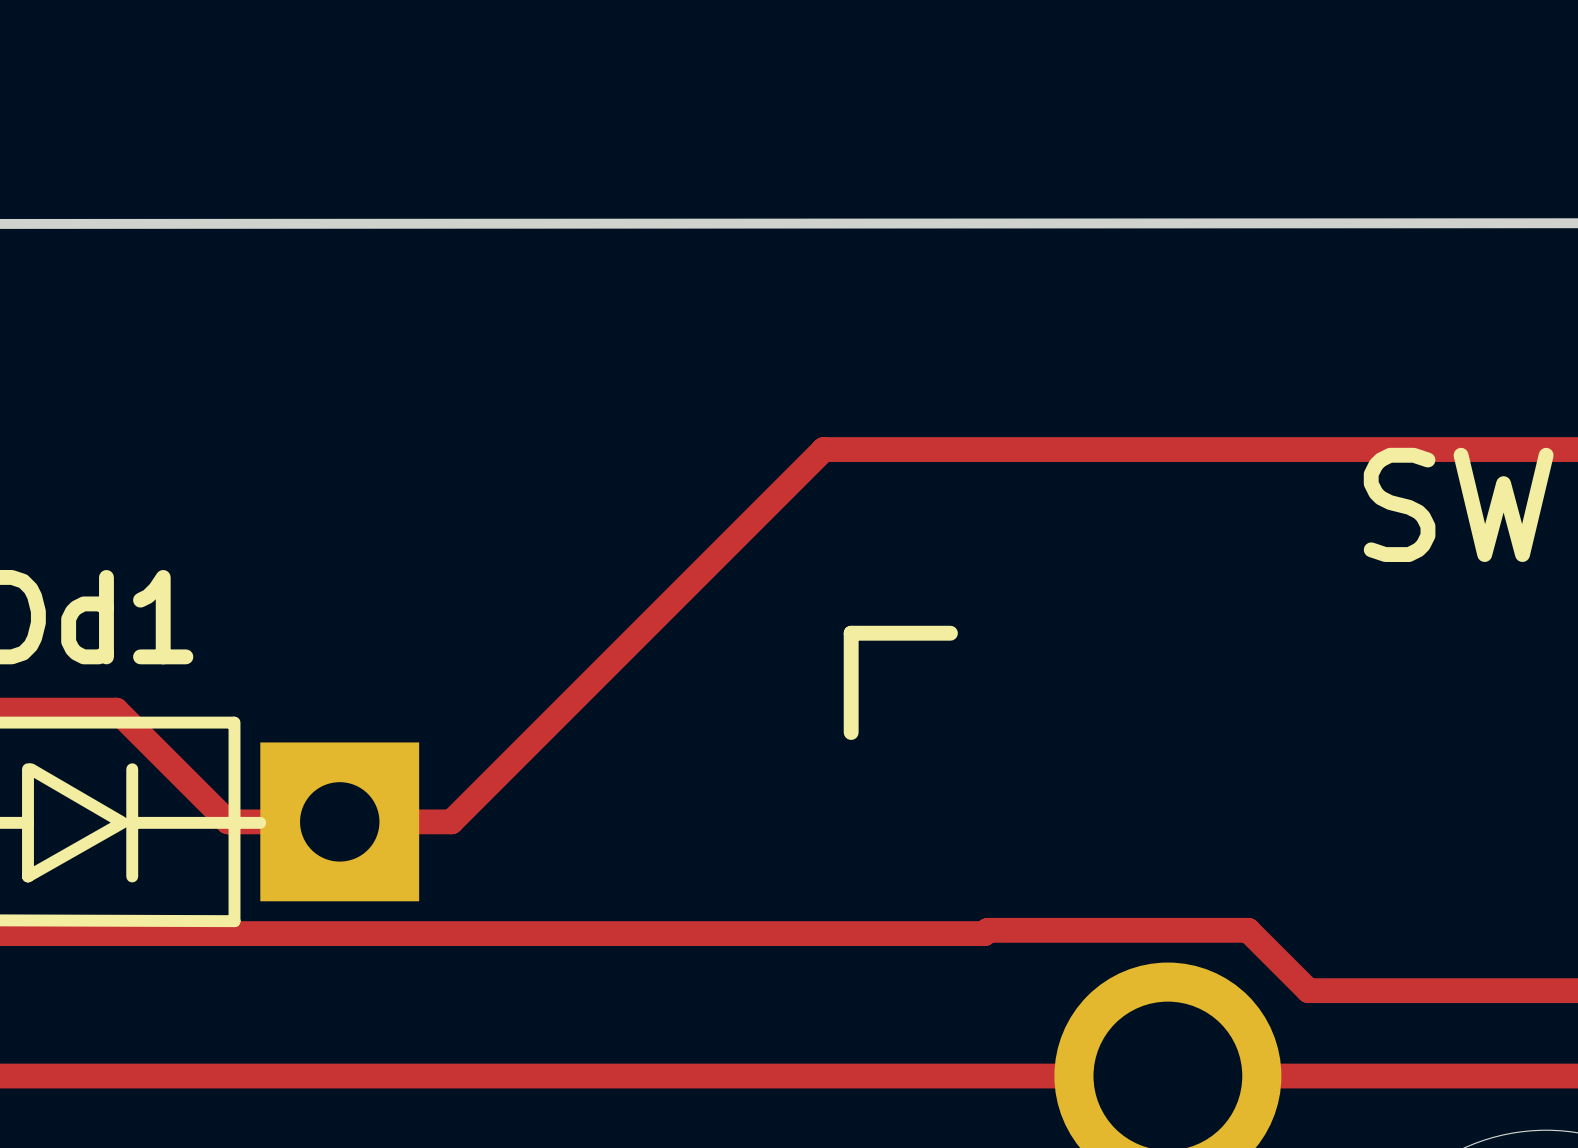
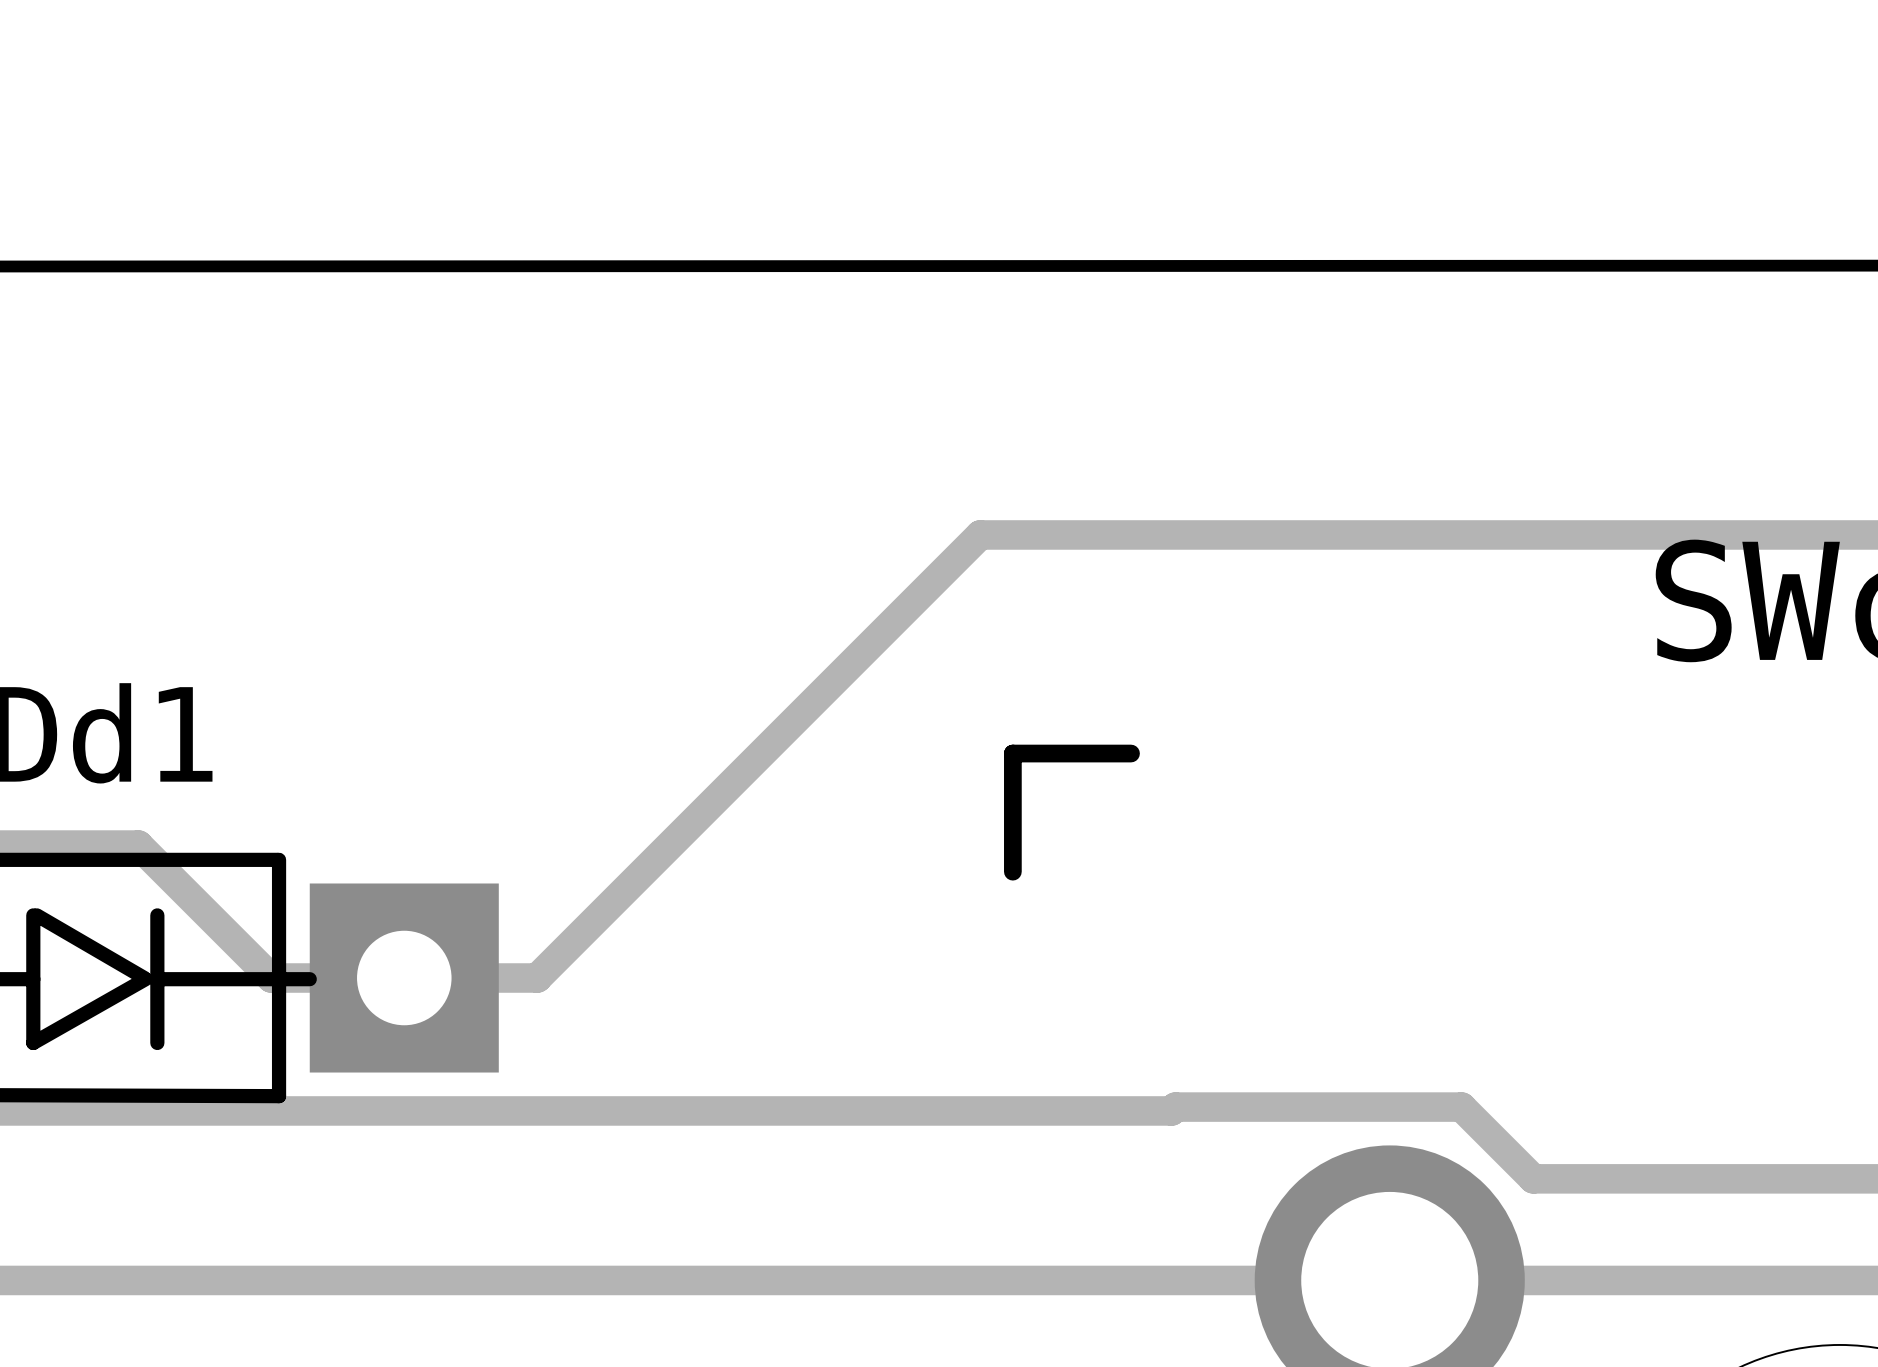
track: (1228, 930) (1248, 930) (1308, 990) -> (1461, 1107) (1533, 1178) (1557, 1178)

